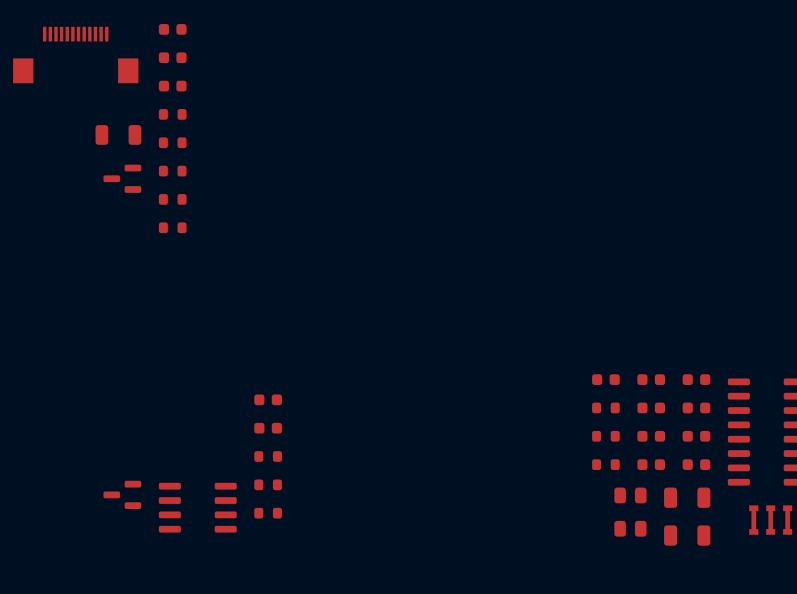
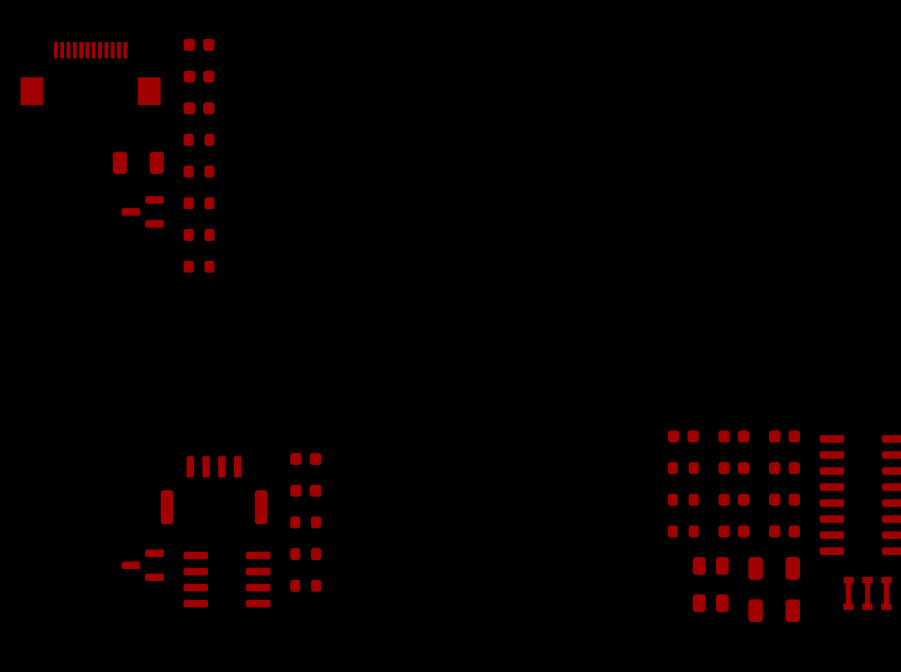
part: none -> (214, 490)

